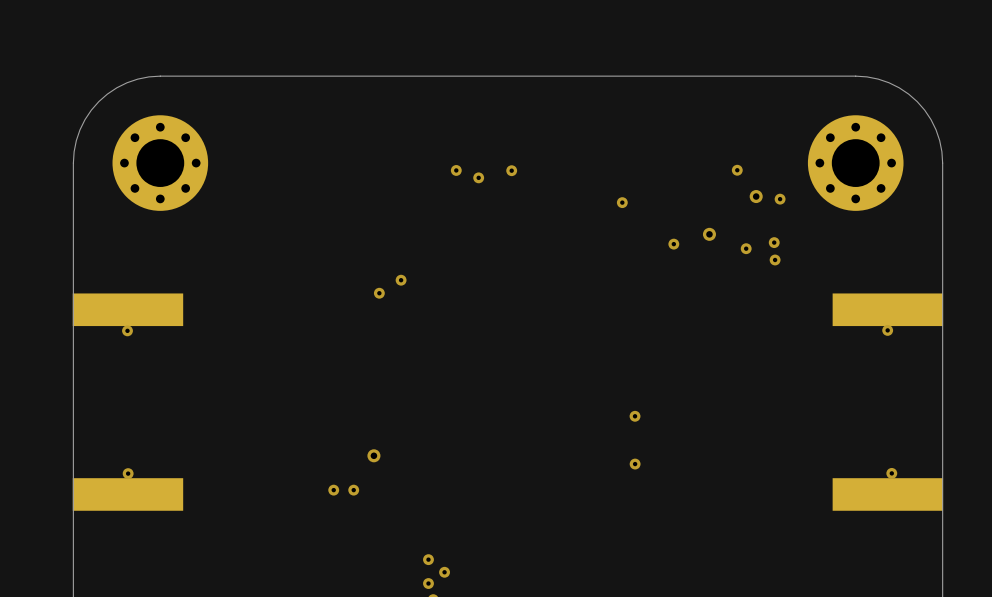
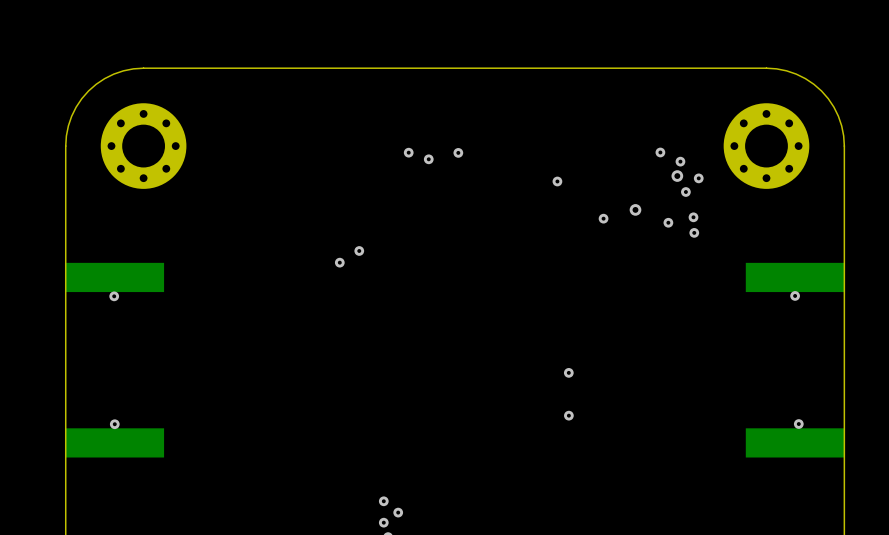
via: none -> (680, 161)
via: none -> (685, 192)
via: (373, 455) -> none
via: (333, 490) -> none
via: (353, 490) -> none

